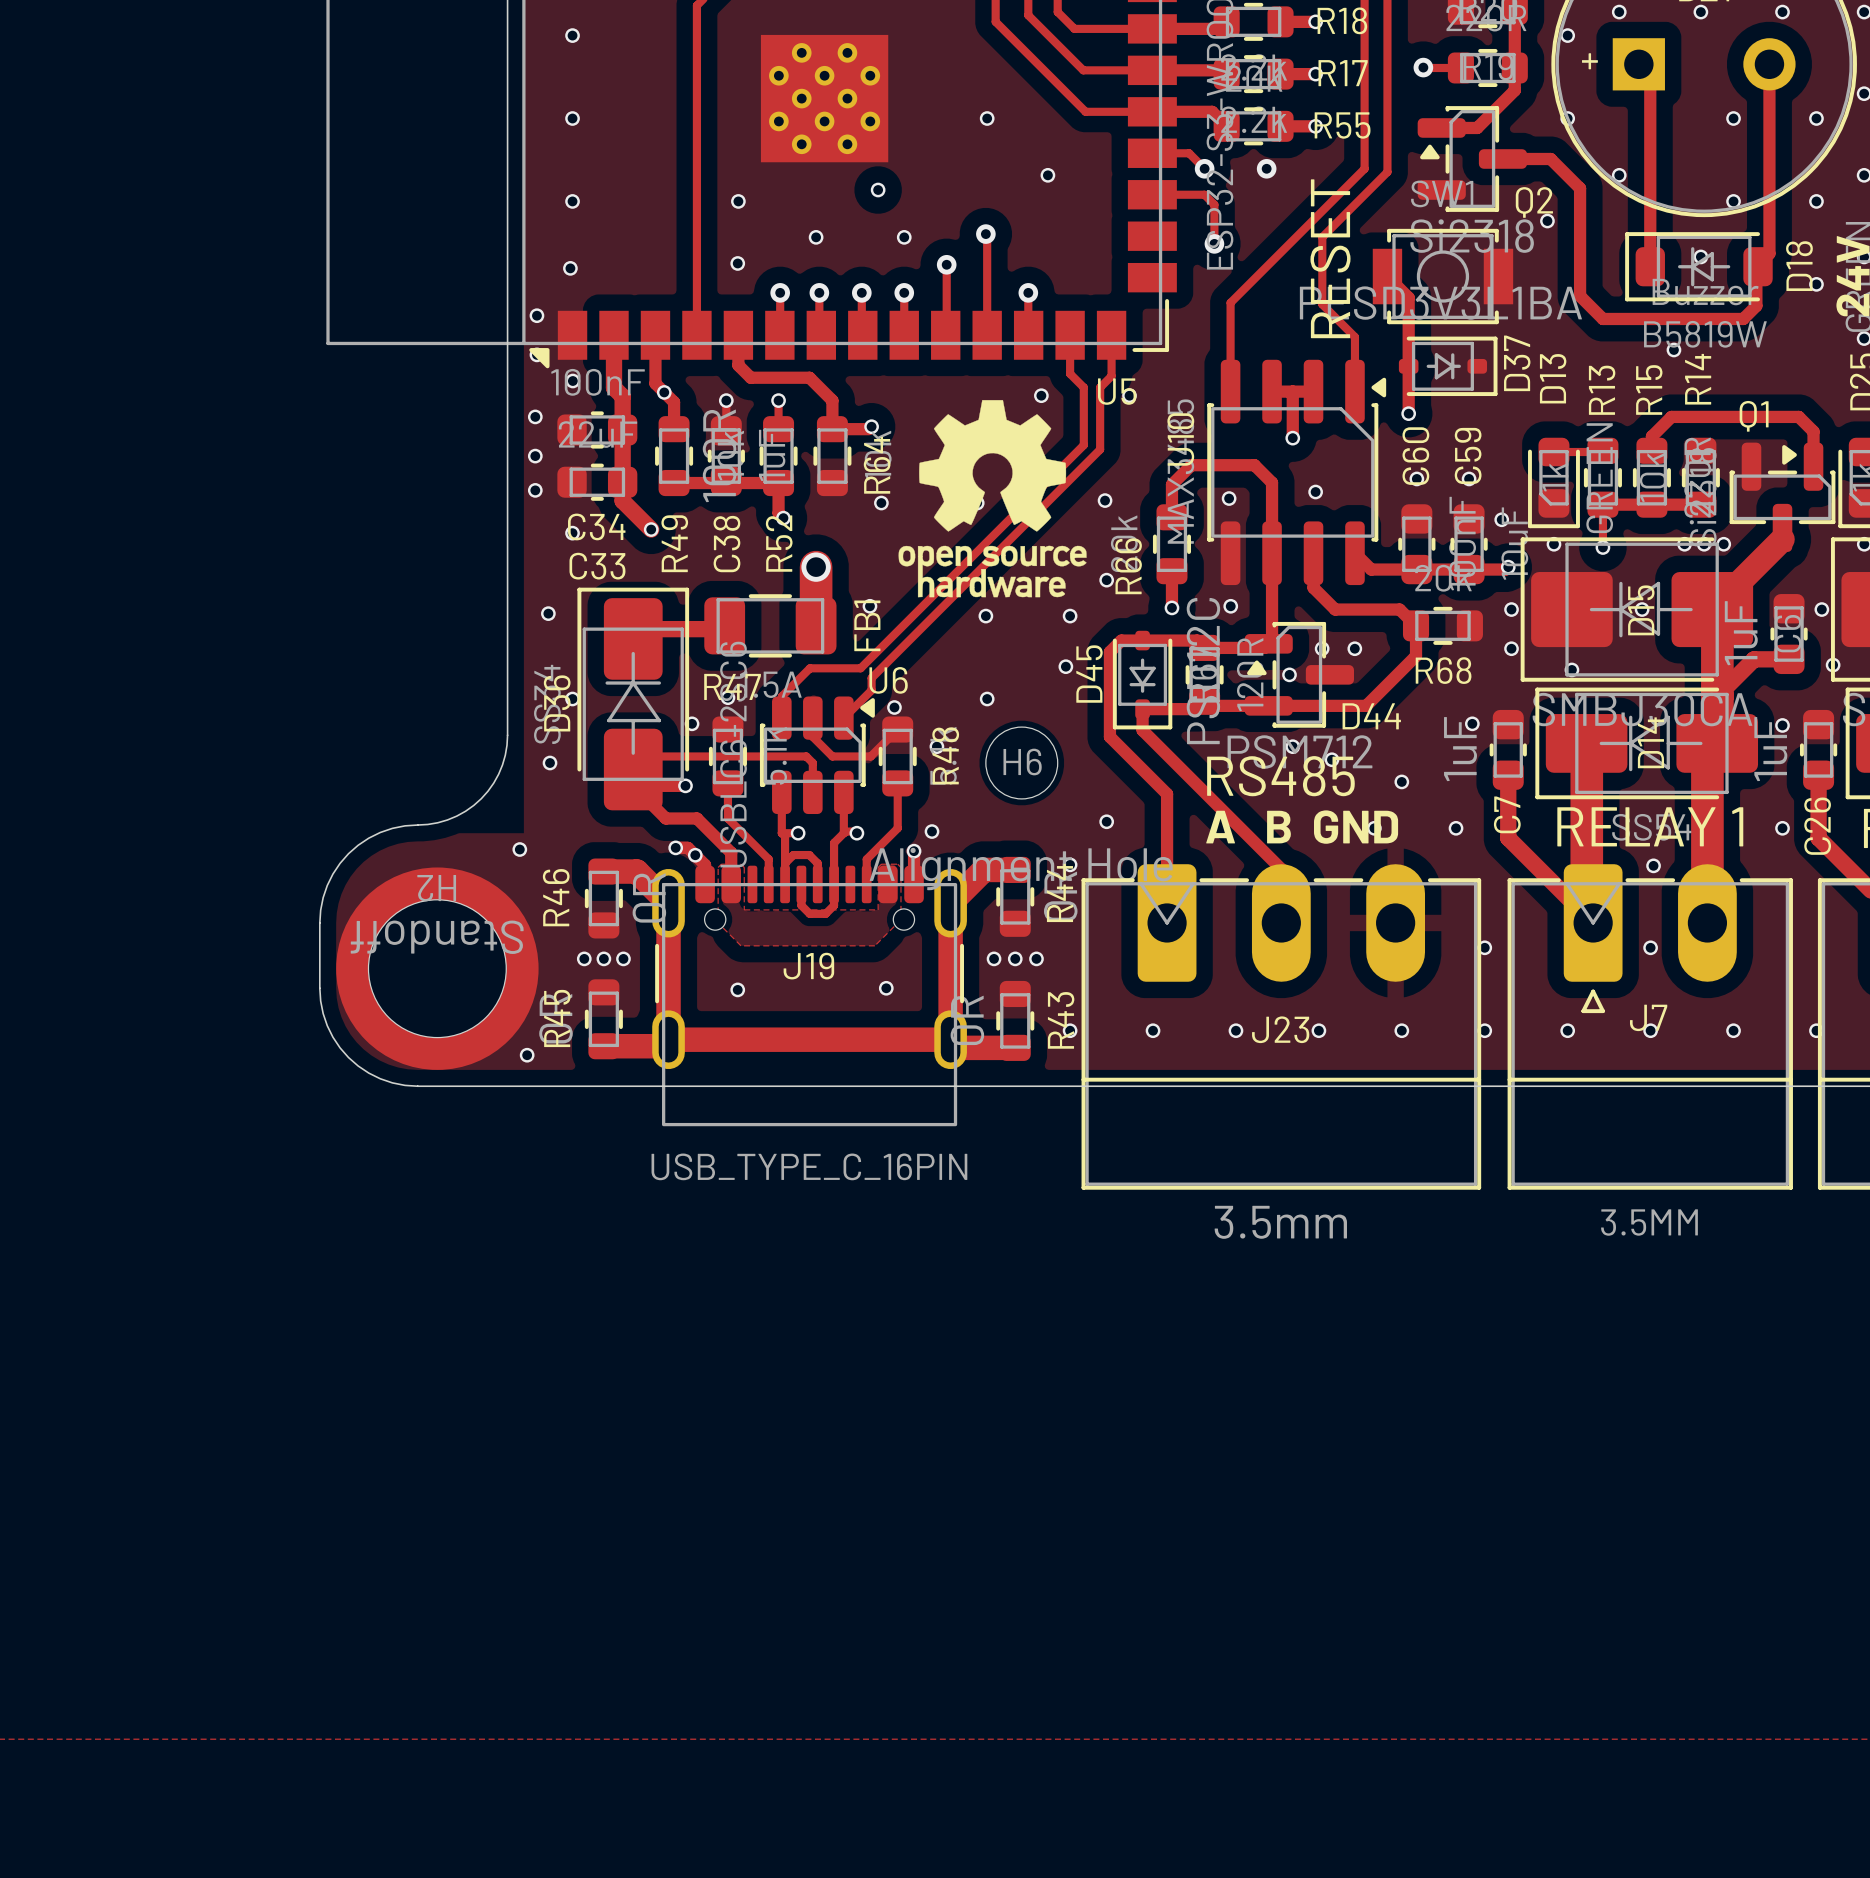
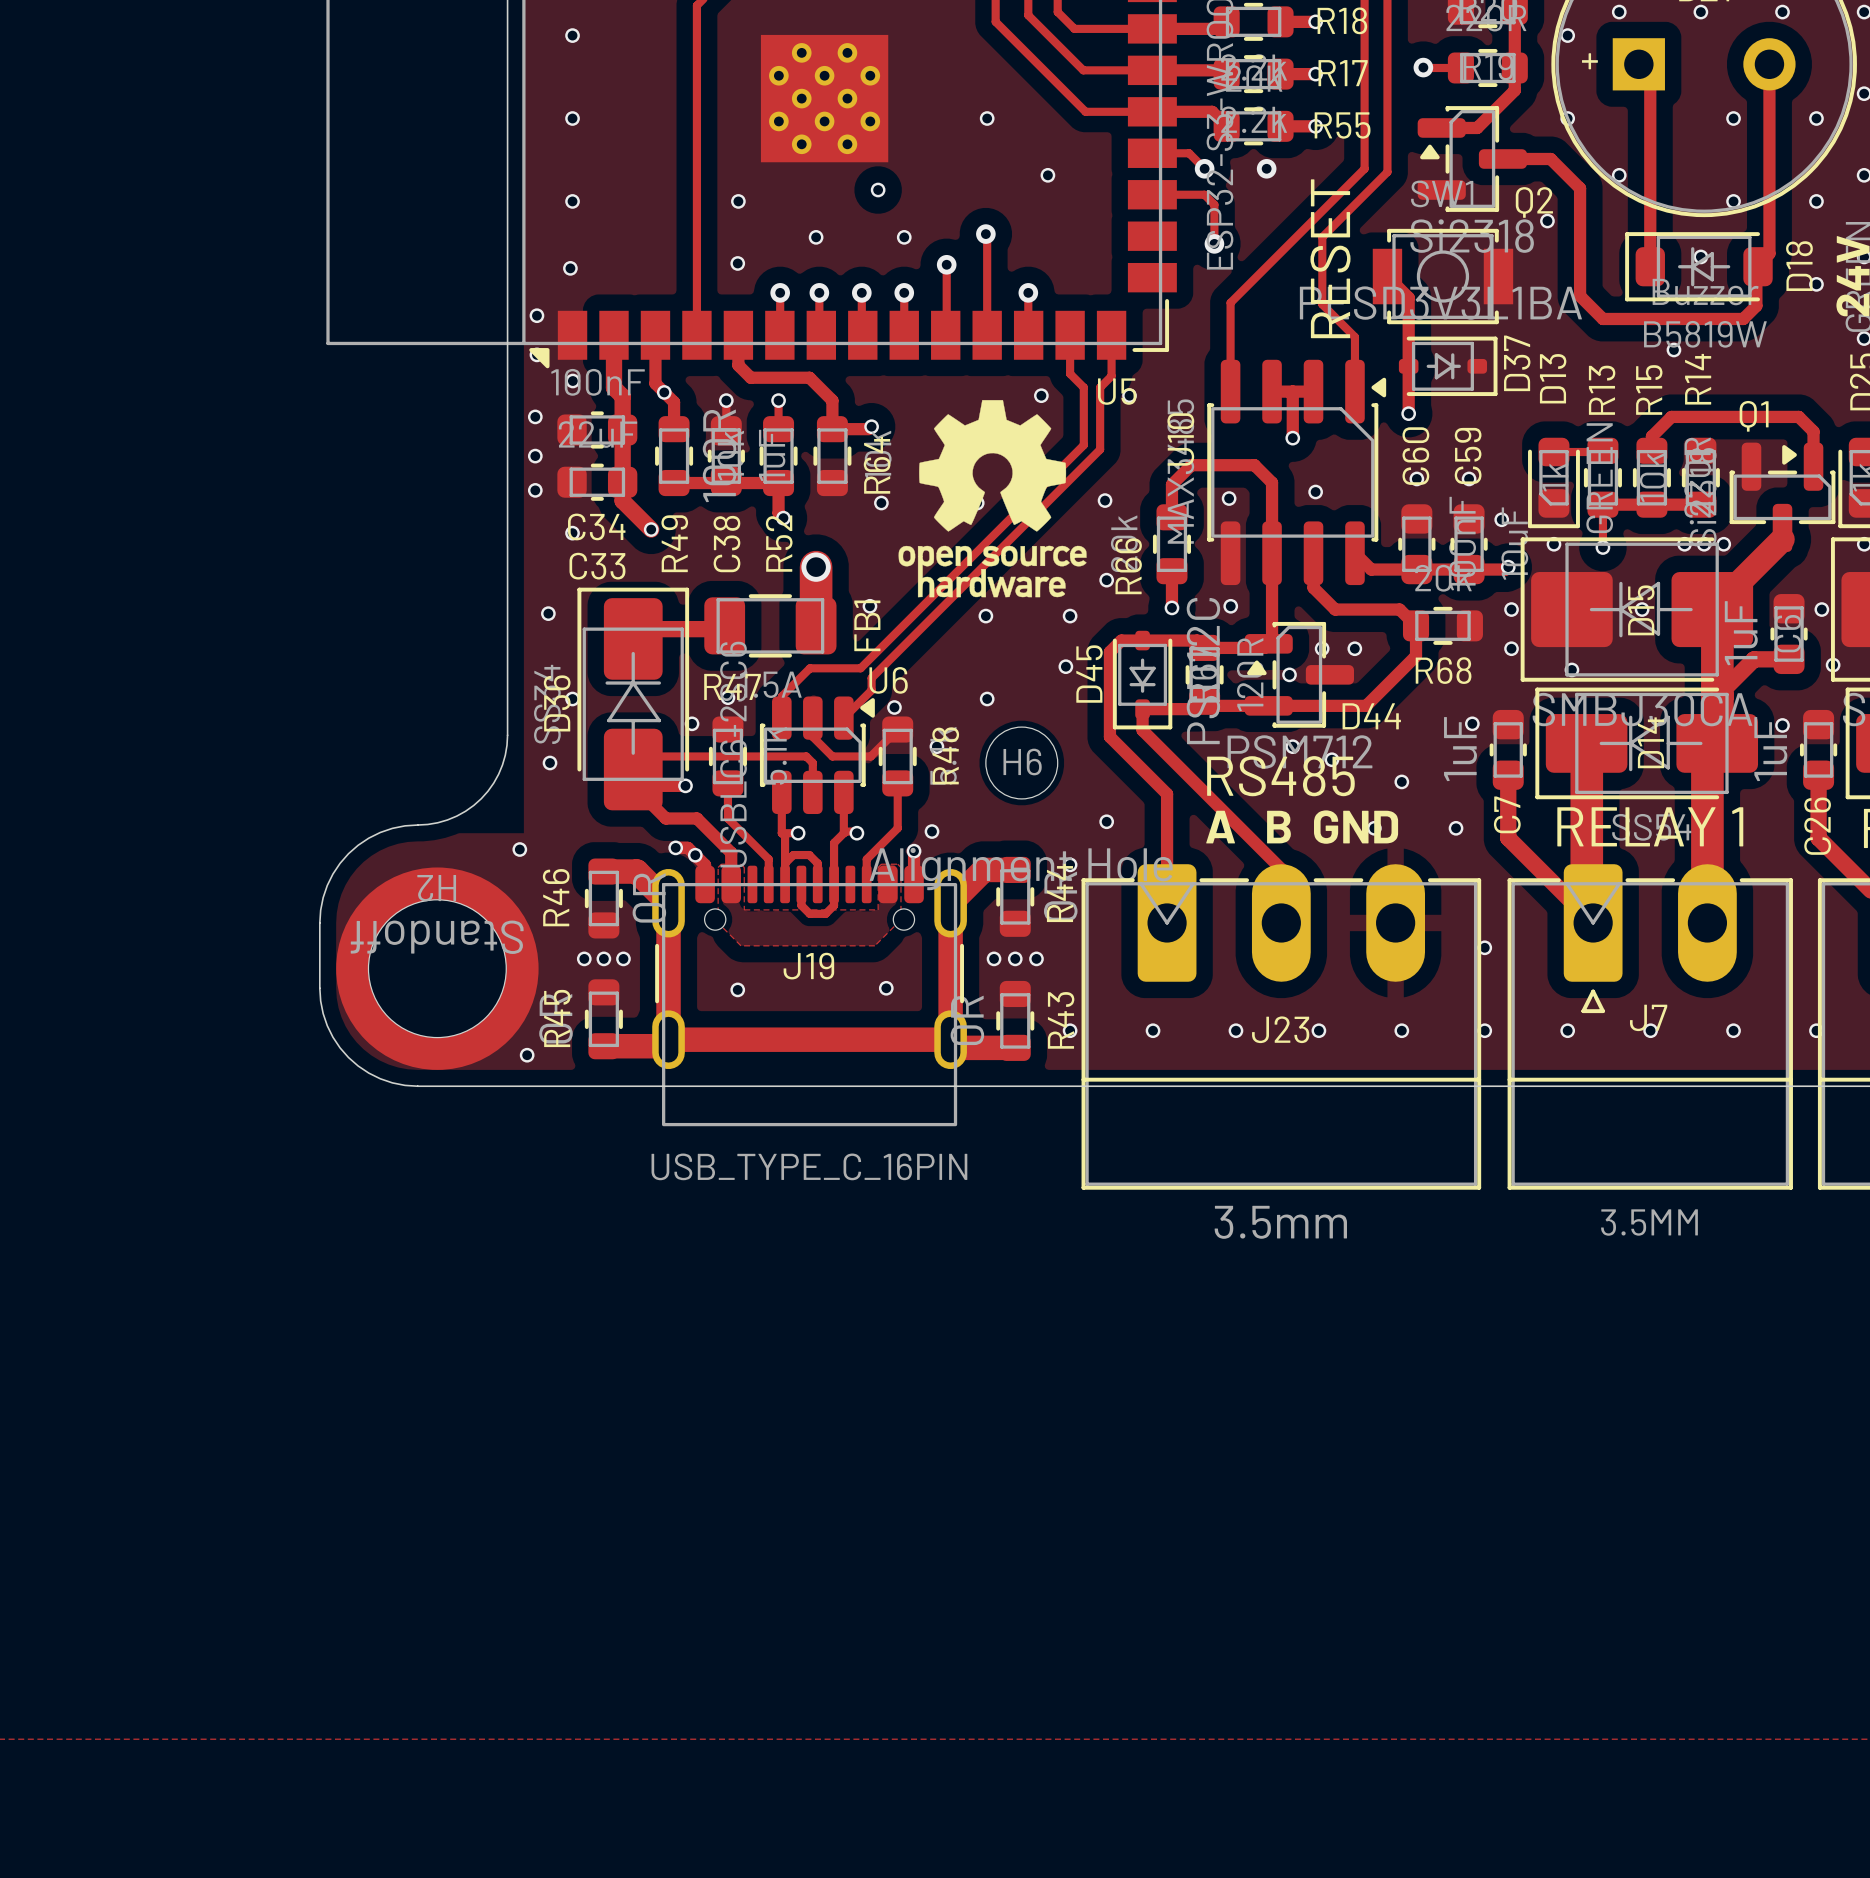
via: (1782, 828) -> none
via: (1653, 865) -> none
via: (1650, 947) -> none

